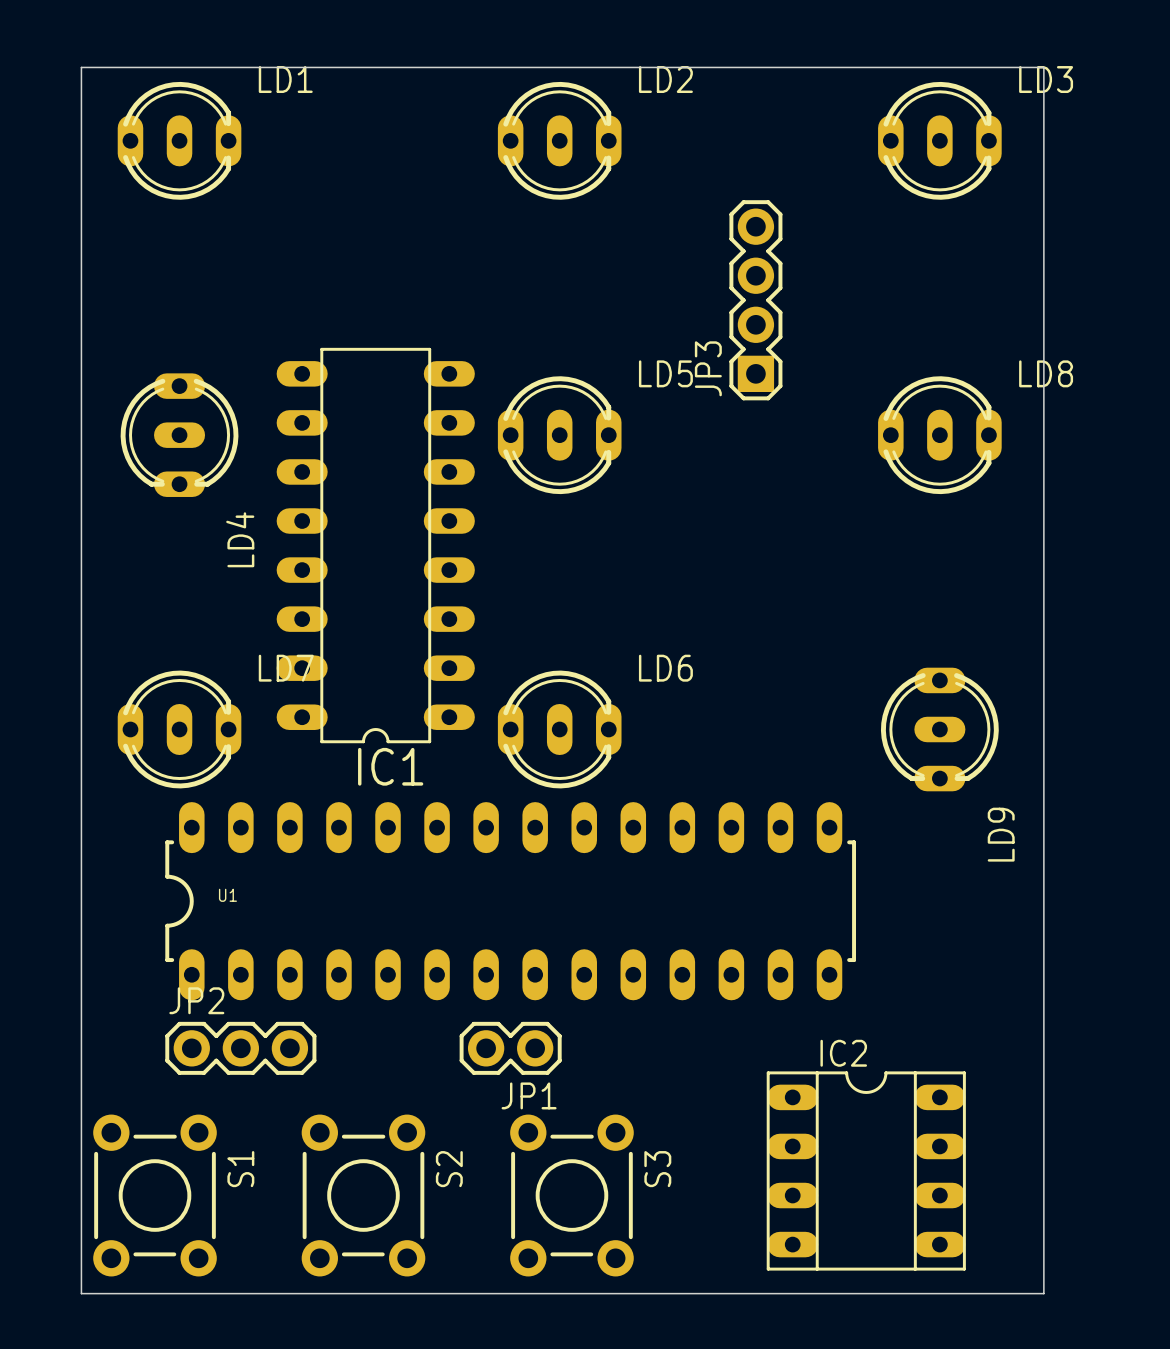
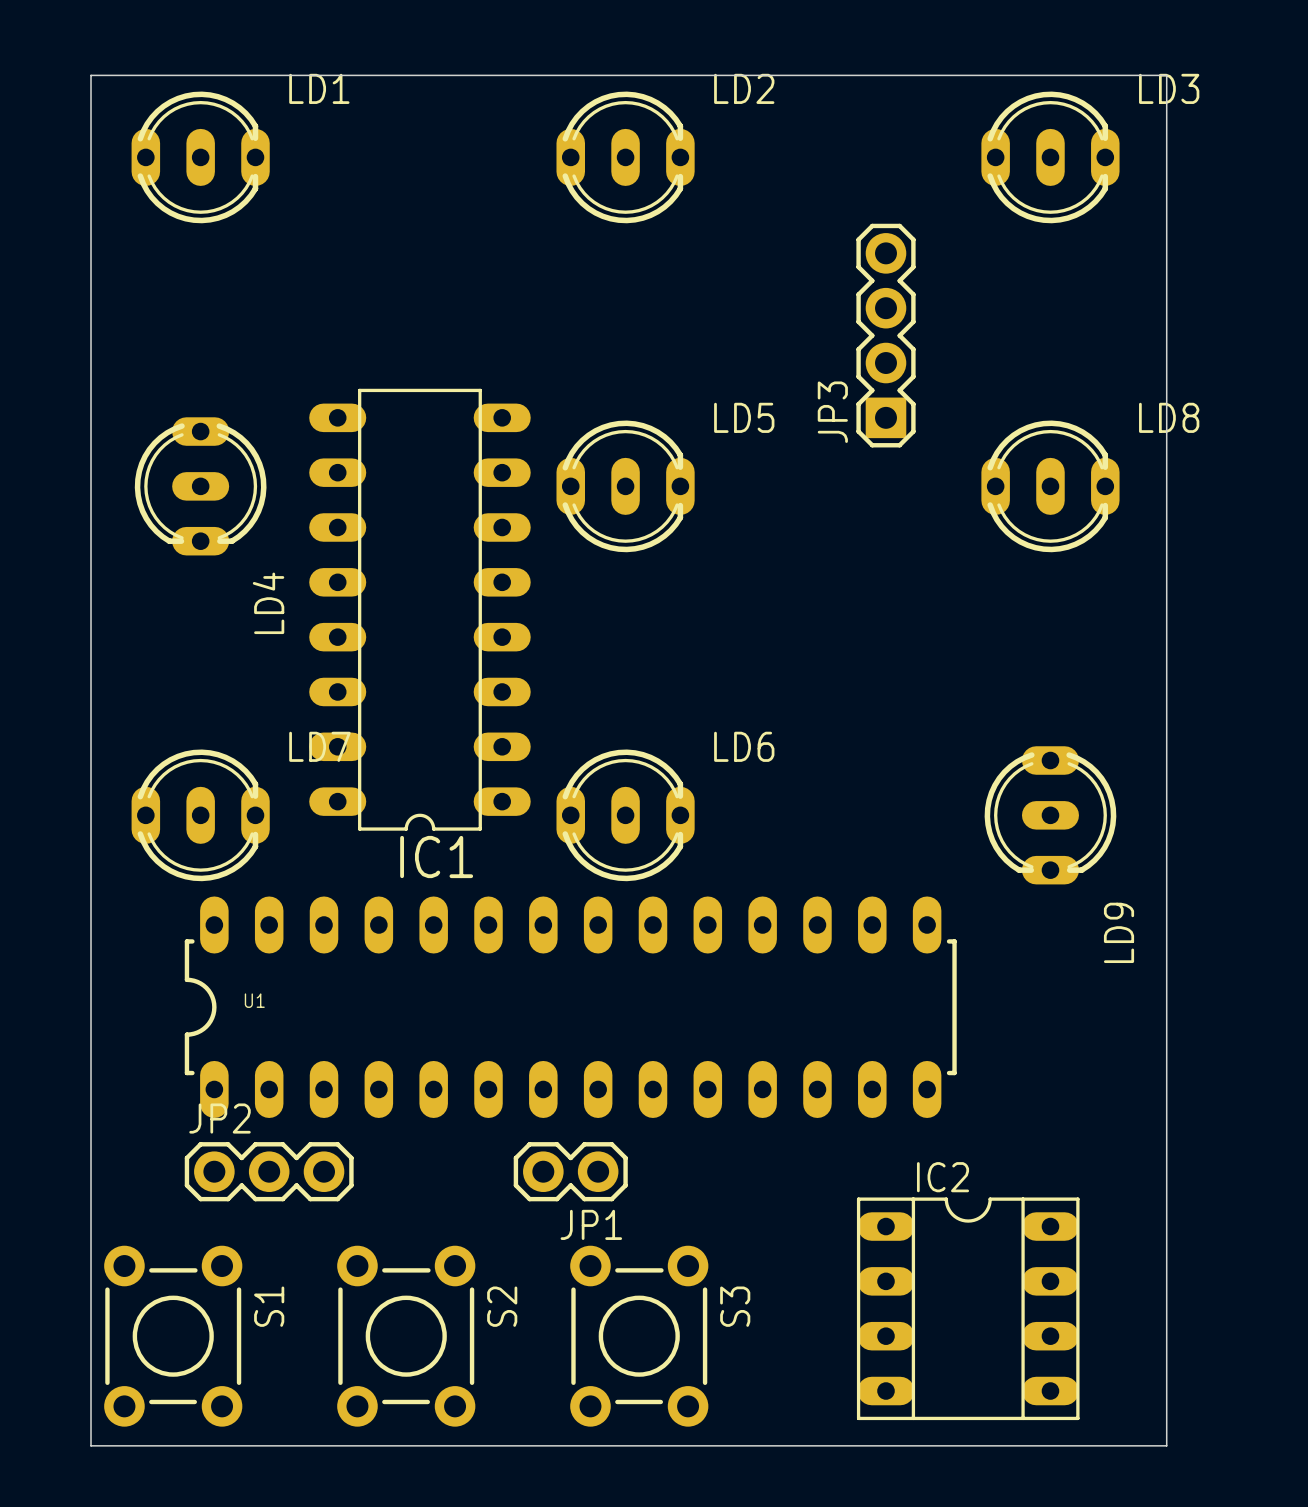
JP3 position: (755, 300) -> (885, 335)

